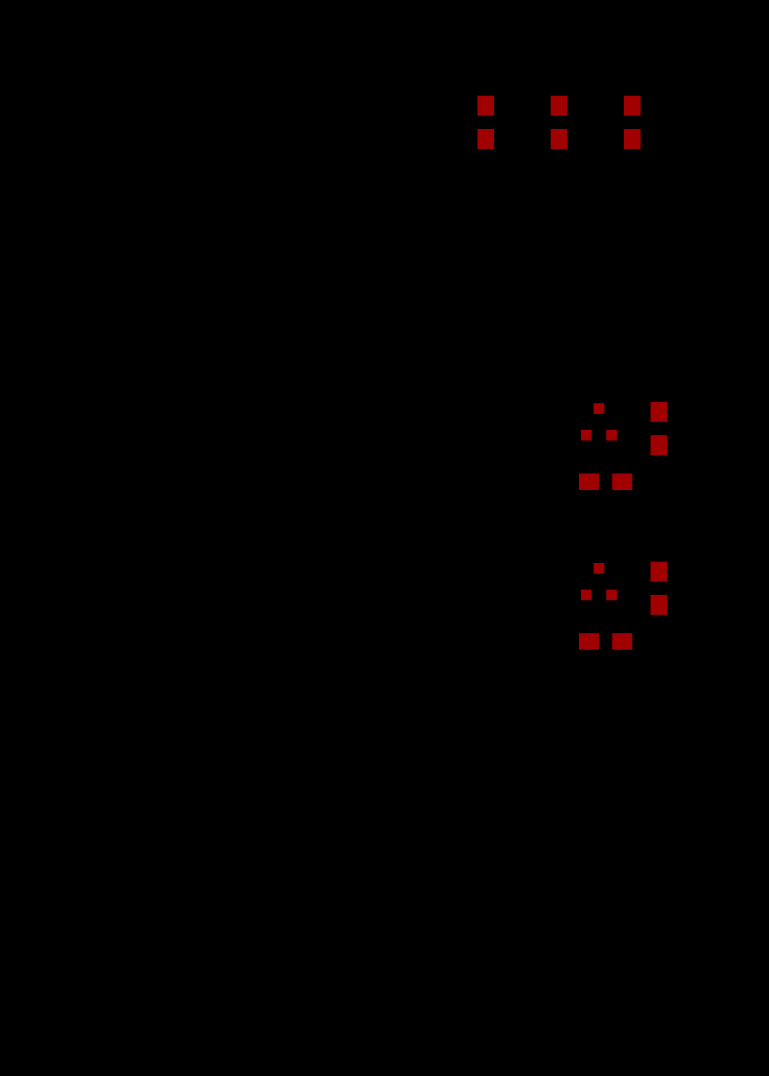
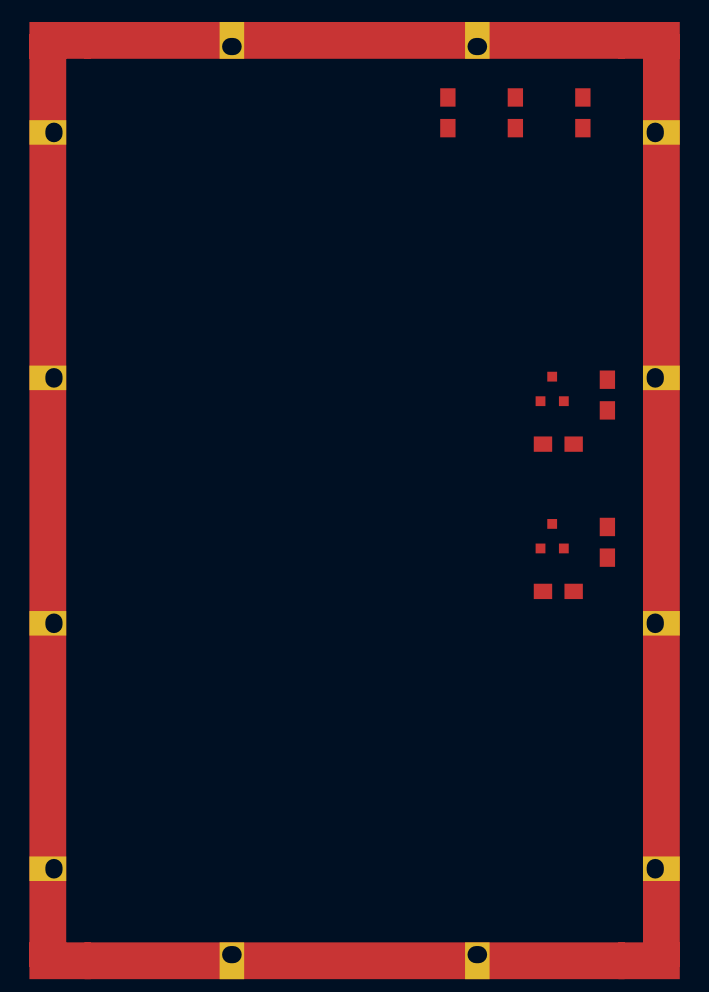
part: none -> (354, 500)

